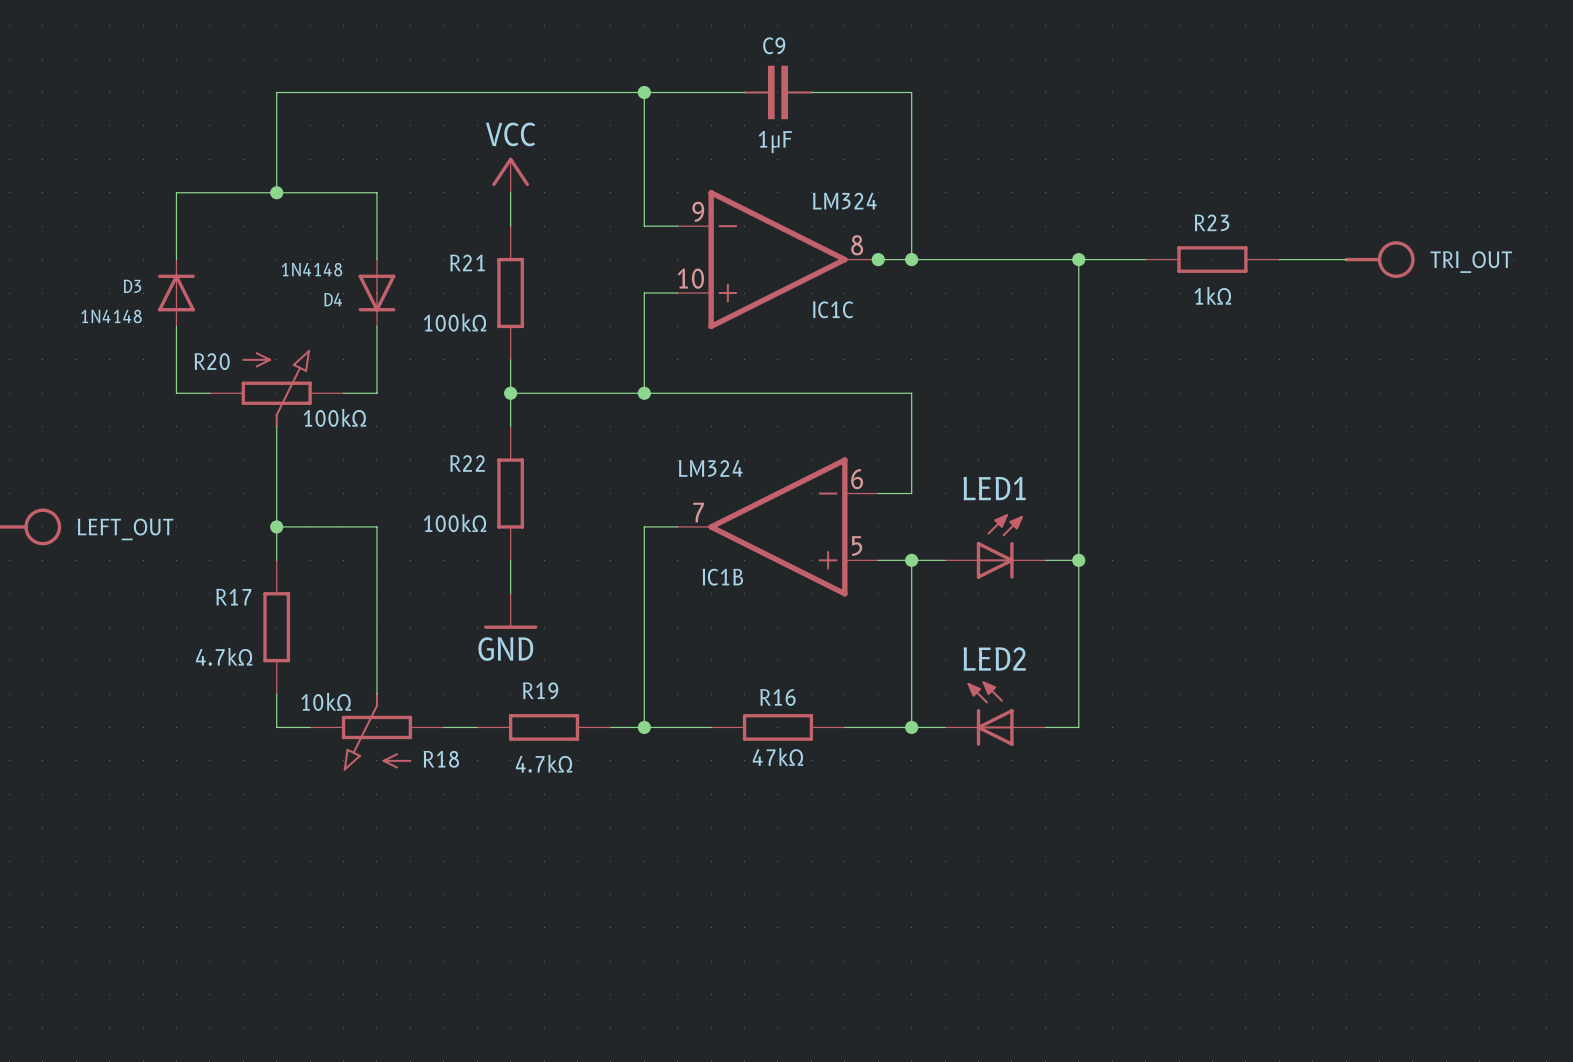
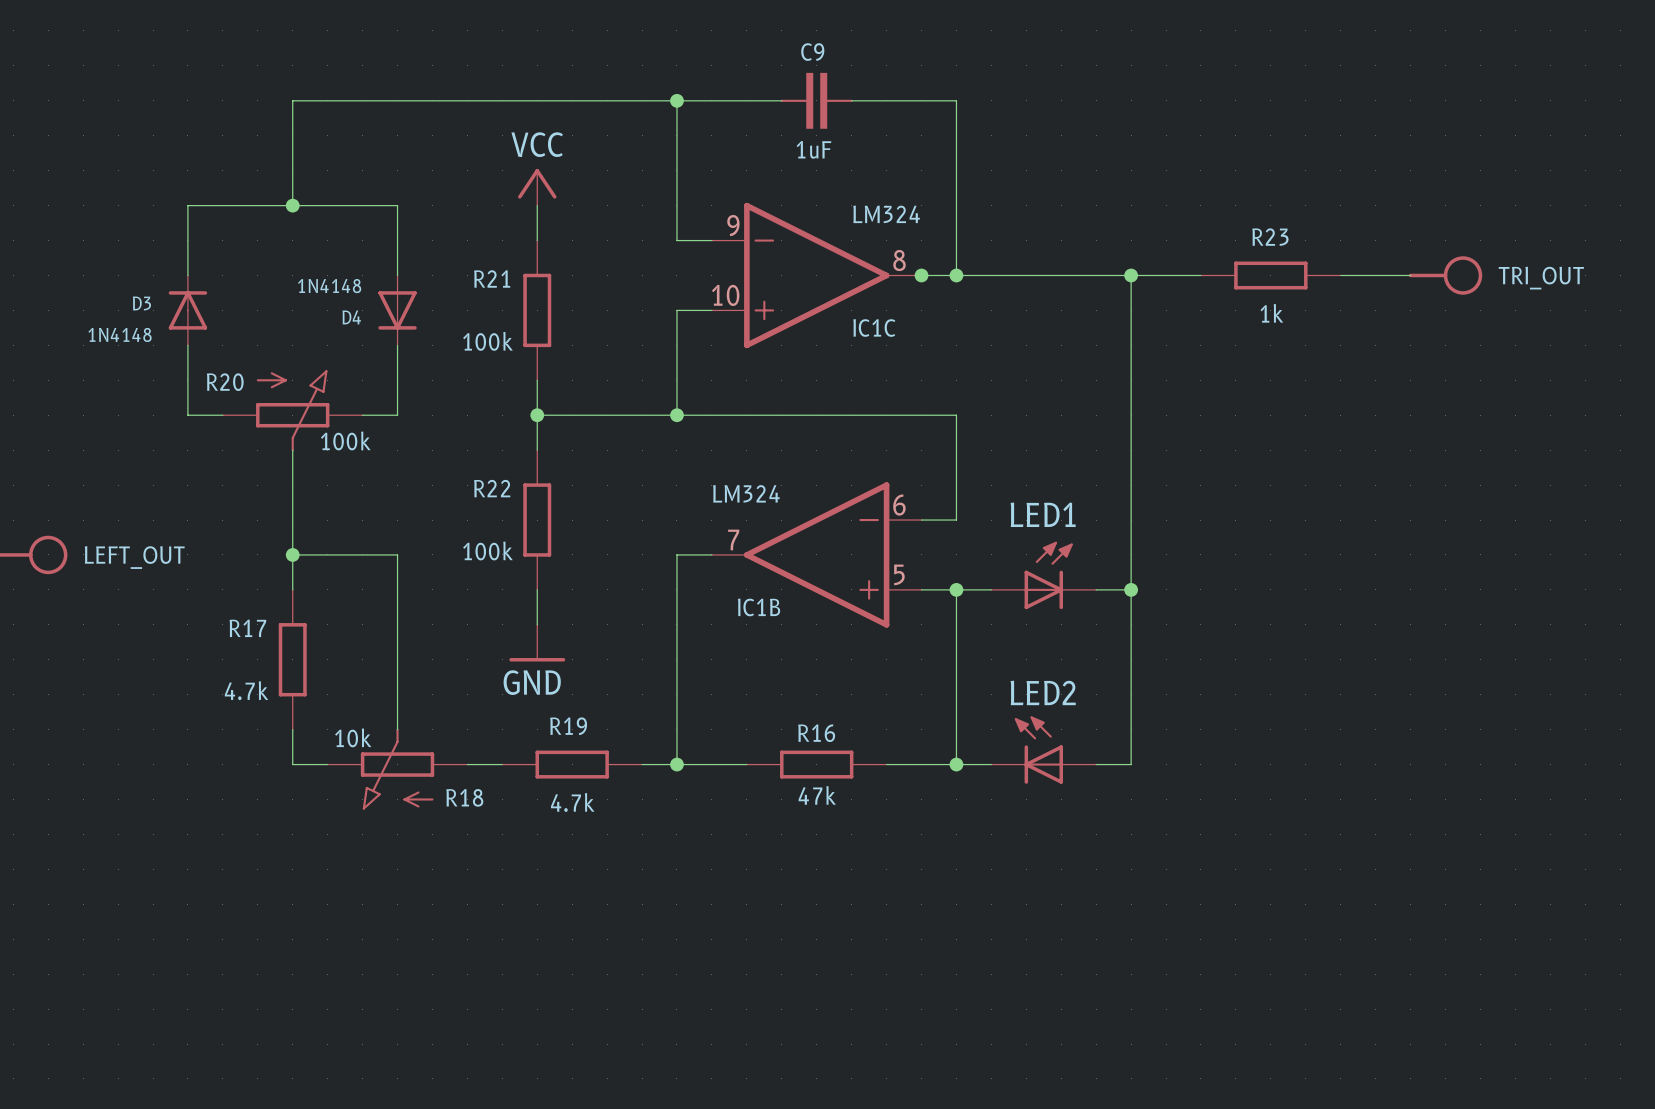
C9 value: 1μF (775, 142) -> 1uF (813, 149)
R23 value: 1kΩ (1212, 295) -> 1k (1271, 313)
R21 value: 100kΩ (455, 322) -> 100k (487, 341)
R20 value: 100kΩ (334, 417) -> 100k (345, 440)
R22 value: 100kΩ (455, 523) -> 100k (487, 550)
R17 value: 4.7kΩ (224, 656) -> 4.7k (246, 690)
R18 value: 10kΩ (326, 701) -> 10k (353, 737)
R16 value: 47kΩ (777, 756) -> 47k (817, 795)
R19 value: 4.7kΩ (544, 763) -> 4.7k (572, 802)

